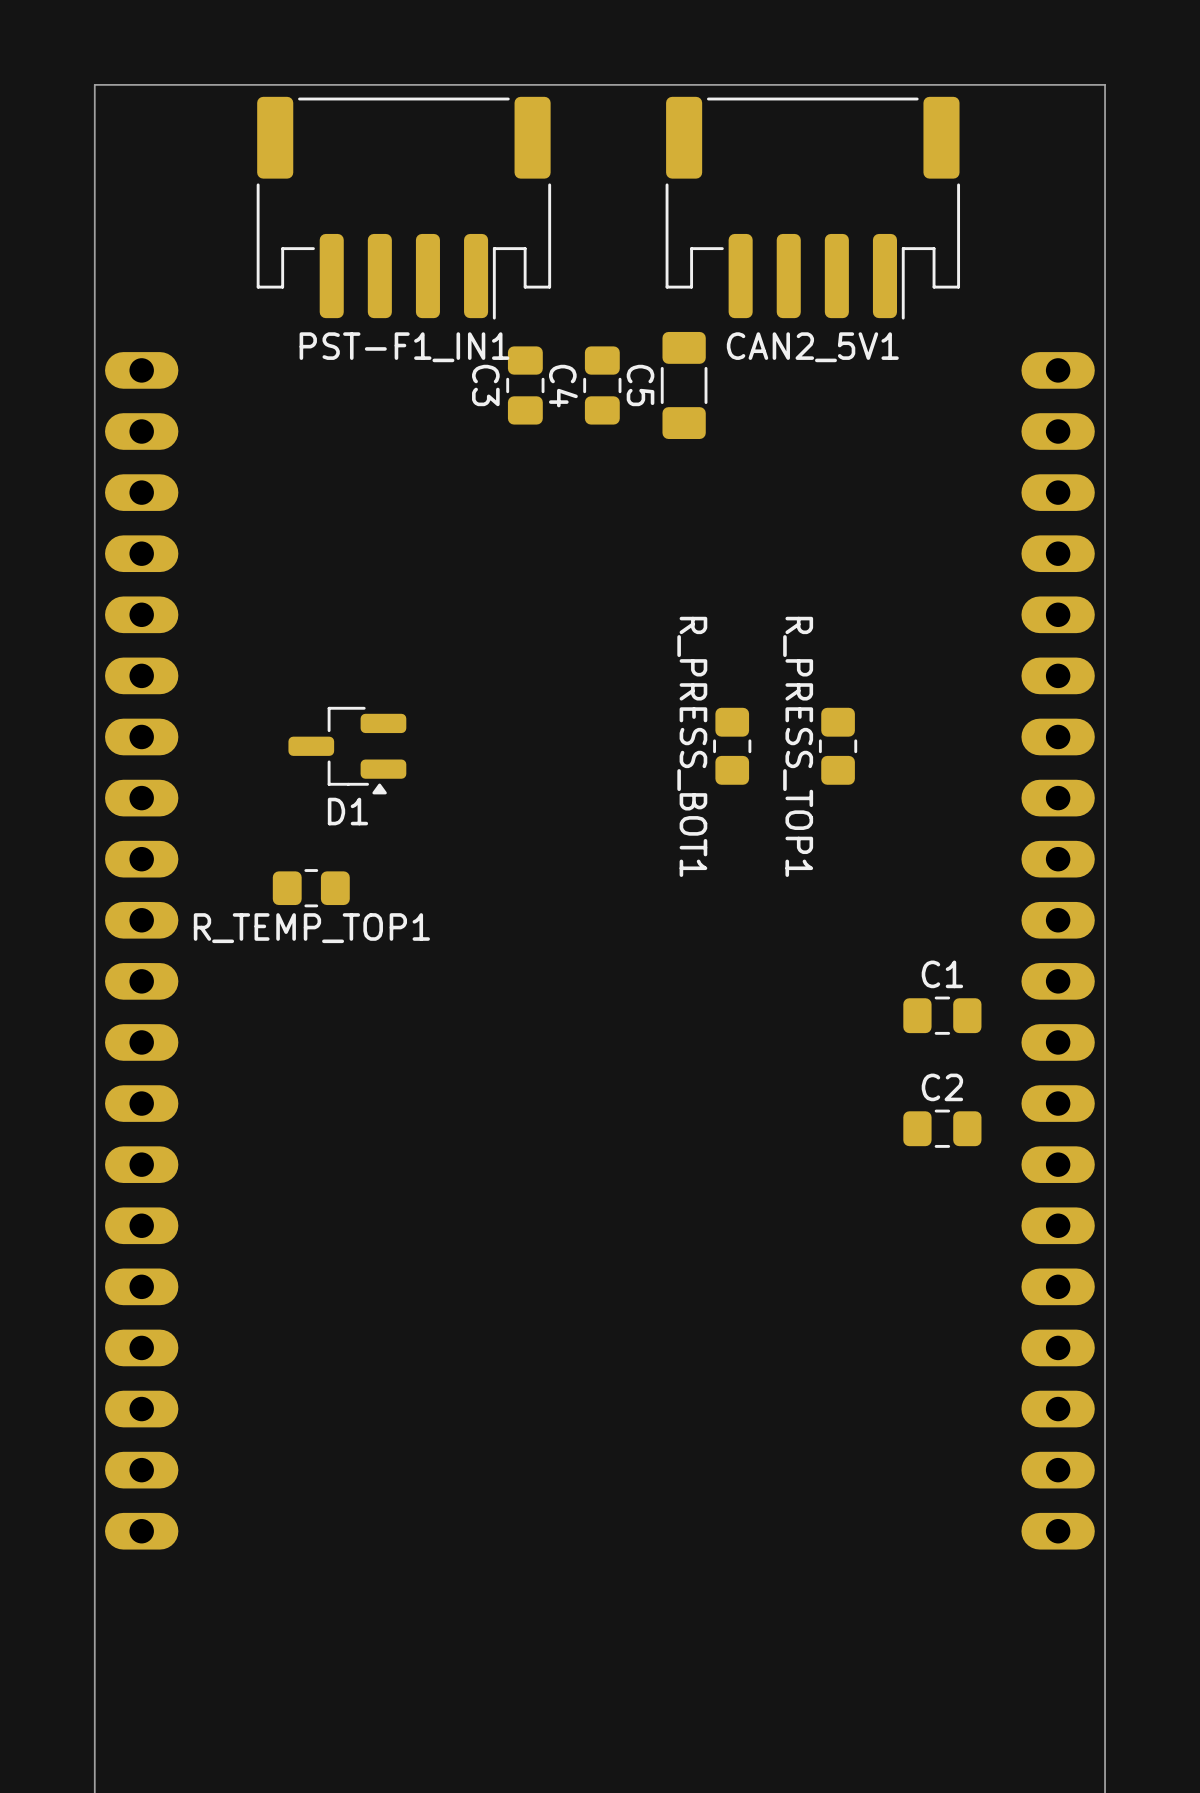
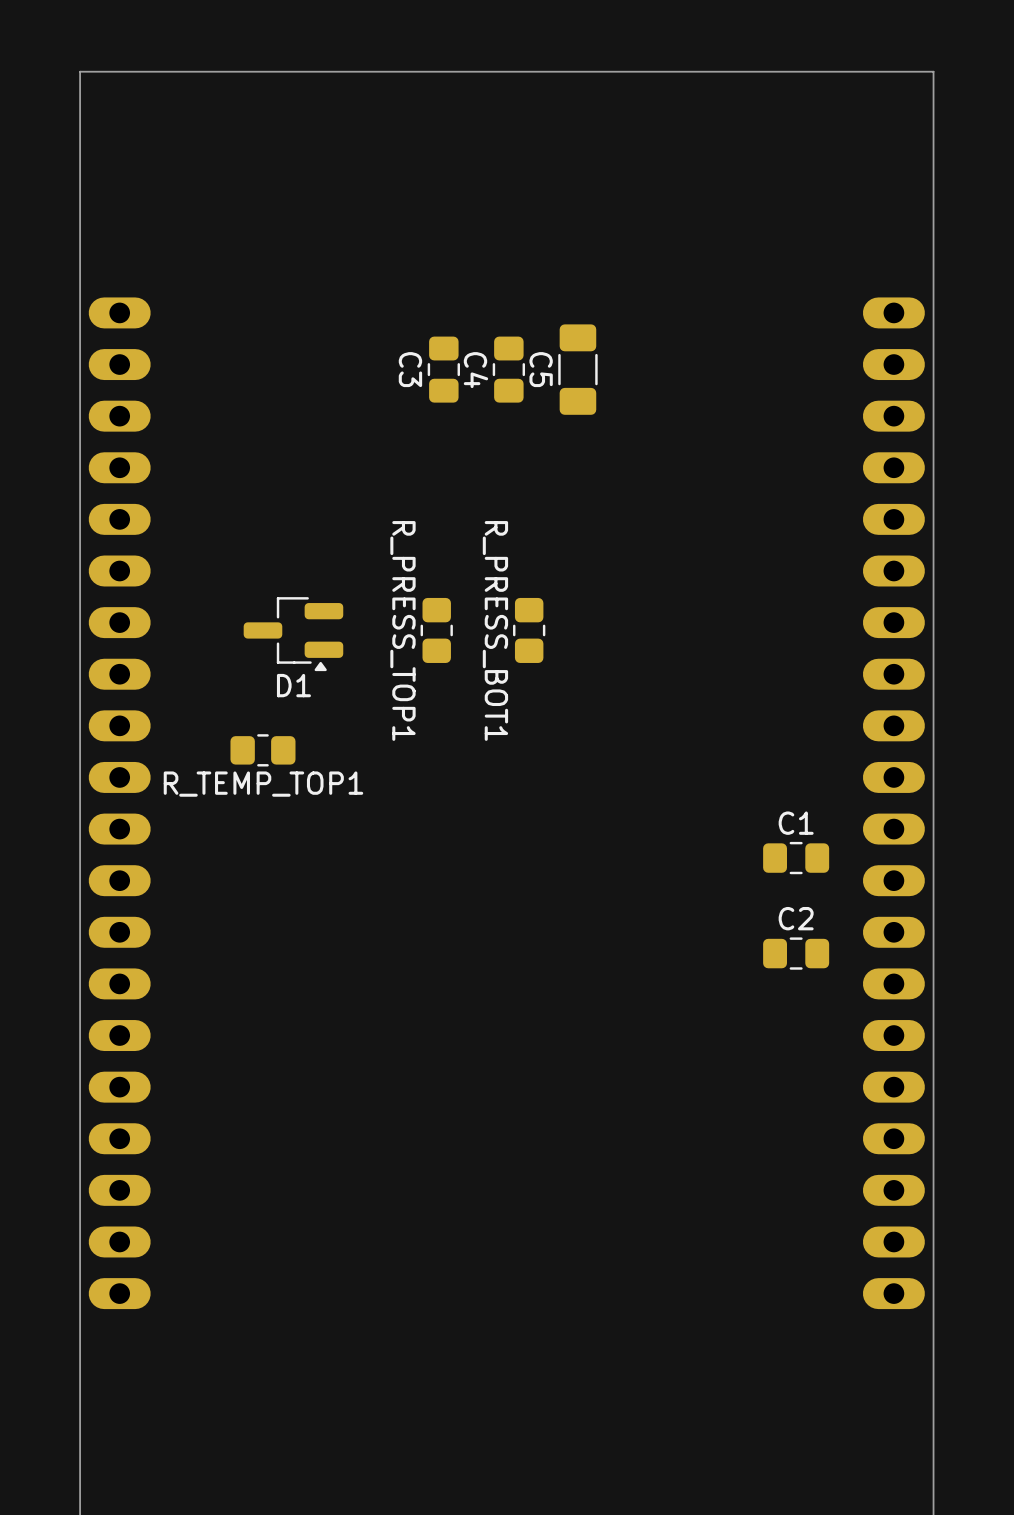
PST-F1_IN1: (403, 208) -> none
CAN2_5V1: (812, 208) -> none
C3 position: (525, 385) -> (443, 369)
C4 position: (602, 385) -> (508, 369)
C5 position: (684, 385) -> (577, 369)
R_PRESS_BOT1 position: (732, 746) -> (529, 630)
R_PRESS_TOP1 position: (838, 746) -> (436, 630)

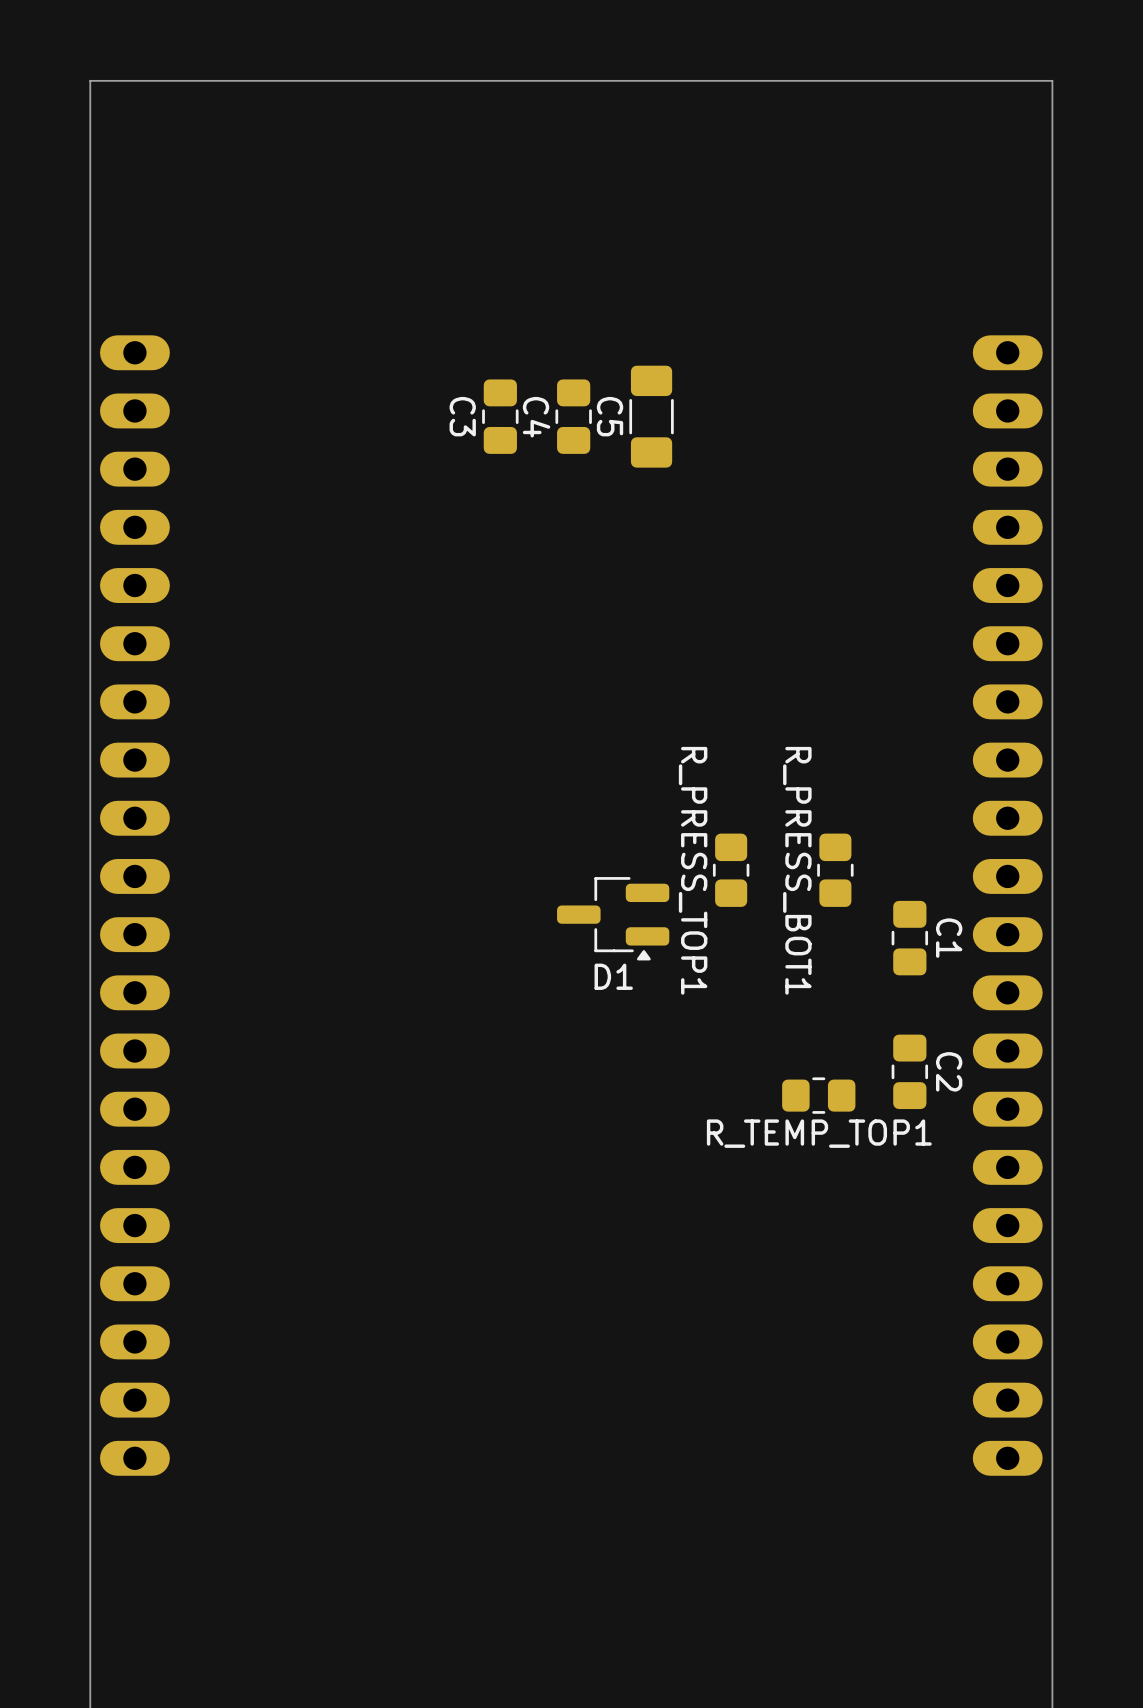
R_PRESS_TOP1 position: (436, 630) -> (731, 870)
R_PRESS_BOT1 position: (529, 630) -> (835, 870)
D1 position: (293, 634) -> (613, 918)
R_TEMP_TOP1 position: (262, 750) -> (818, 1095)
C1 rotation: 0° (796, 858) -> 90° clockwise (909, 938)
C2 rotation: 0° (796, 953) -> 90° clockwise (909, 1071)

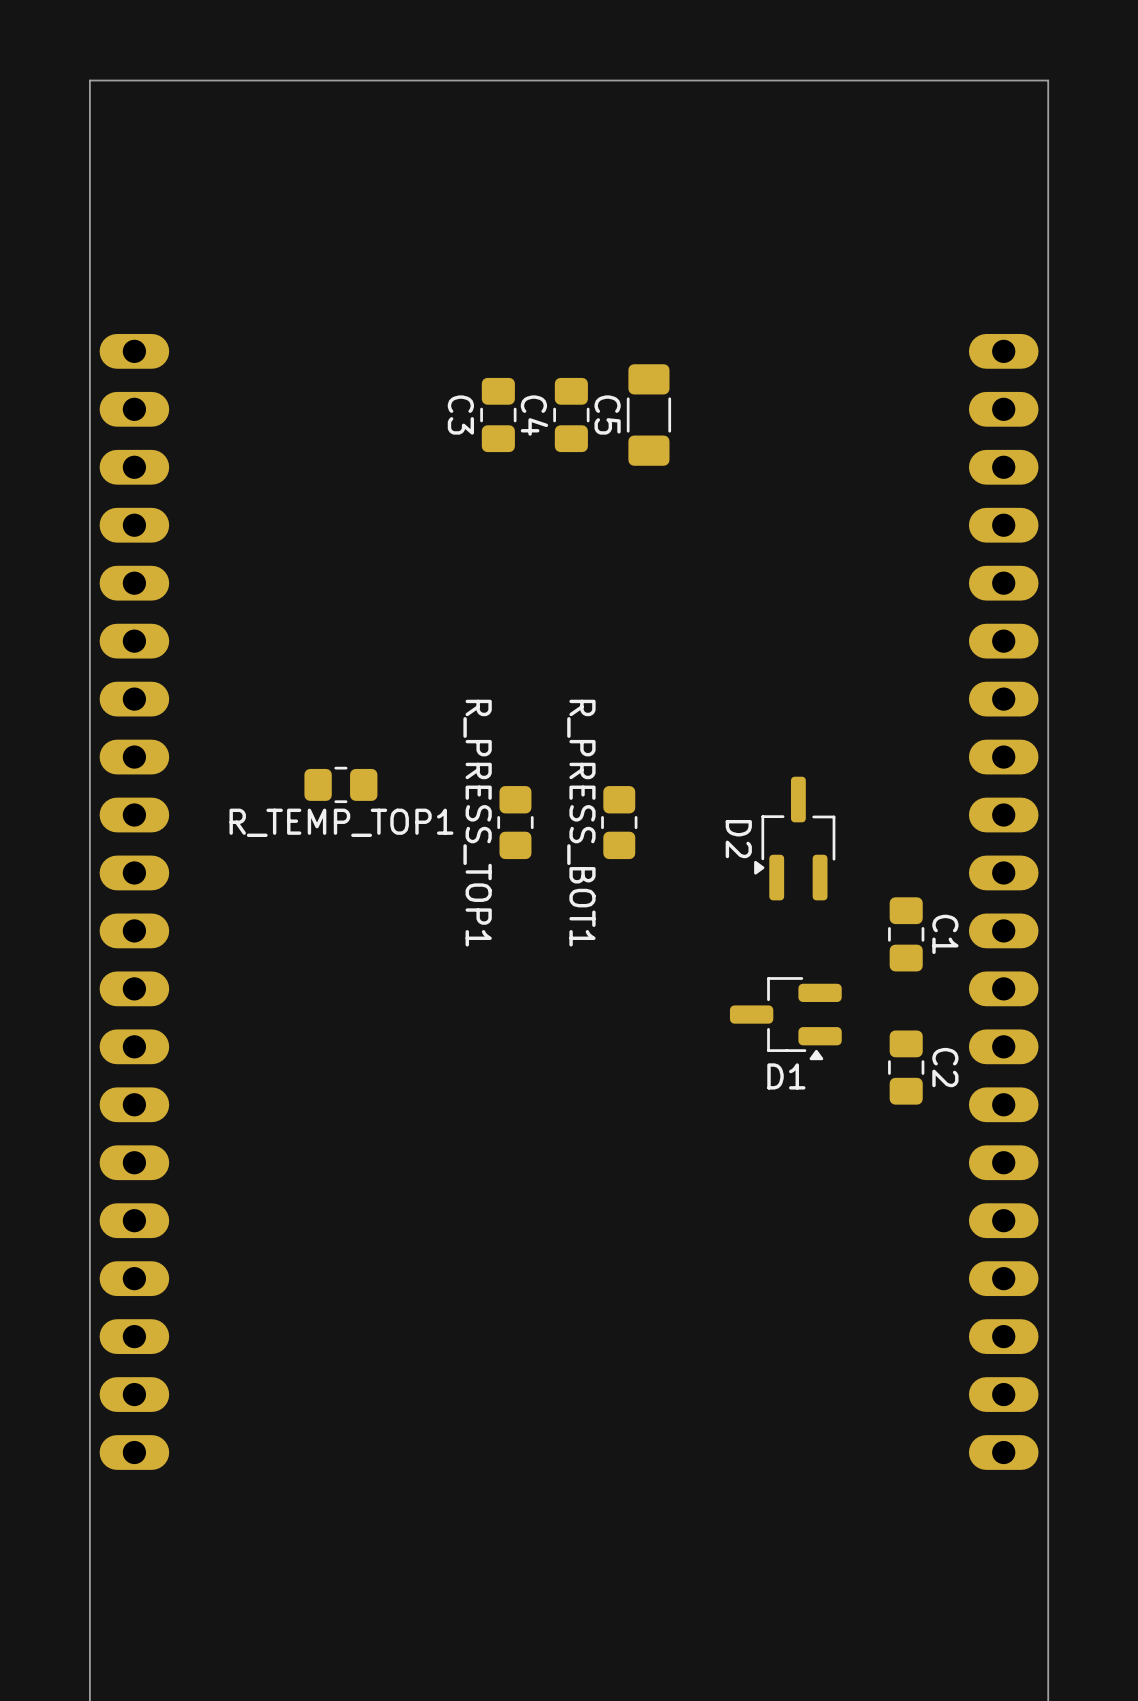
D2: none -> (794, 838)
R_PRESS_TOP1 position: (731, 870) -> (515, 822)
R_PRESS_BOT1 position: (835, 870) -> (619, 822)
D1 position: (613, 918) -> (785, 1018)
R_TEMP_TOP1 position: (818, 1095) -> (340, 784)

